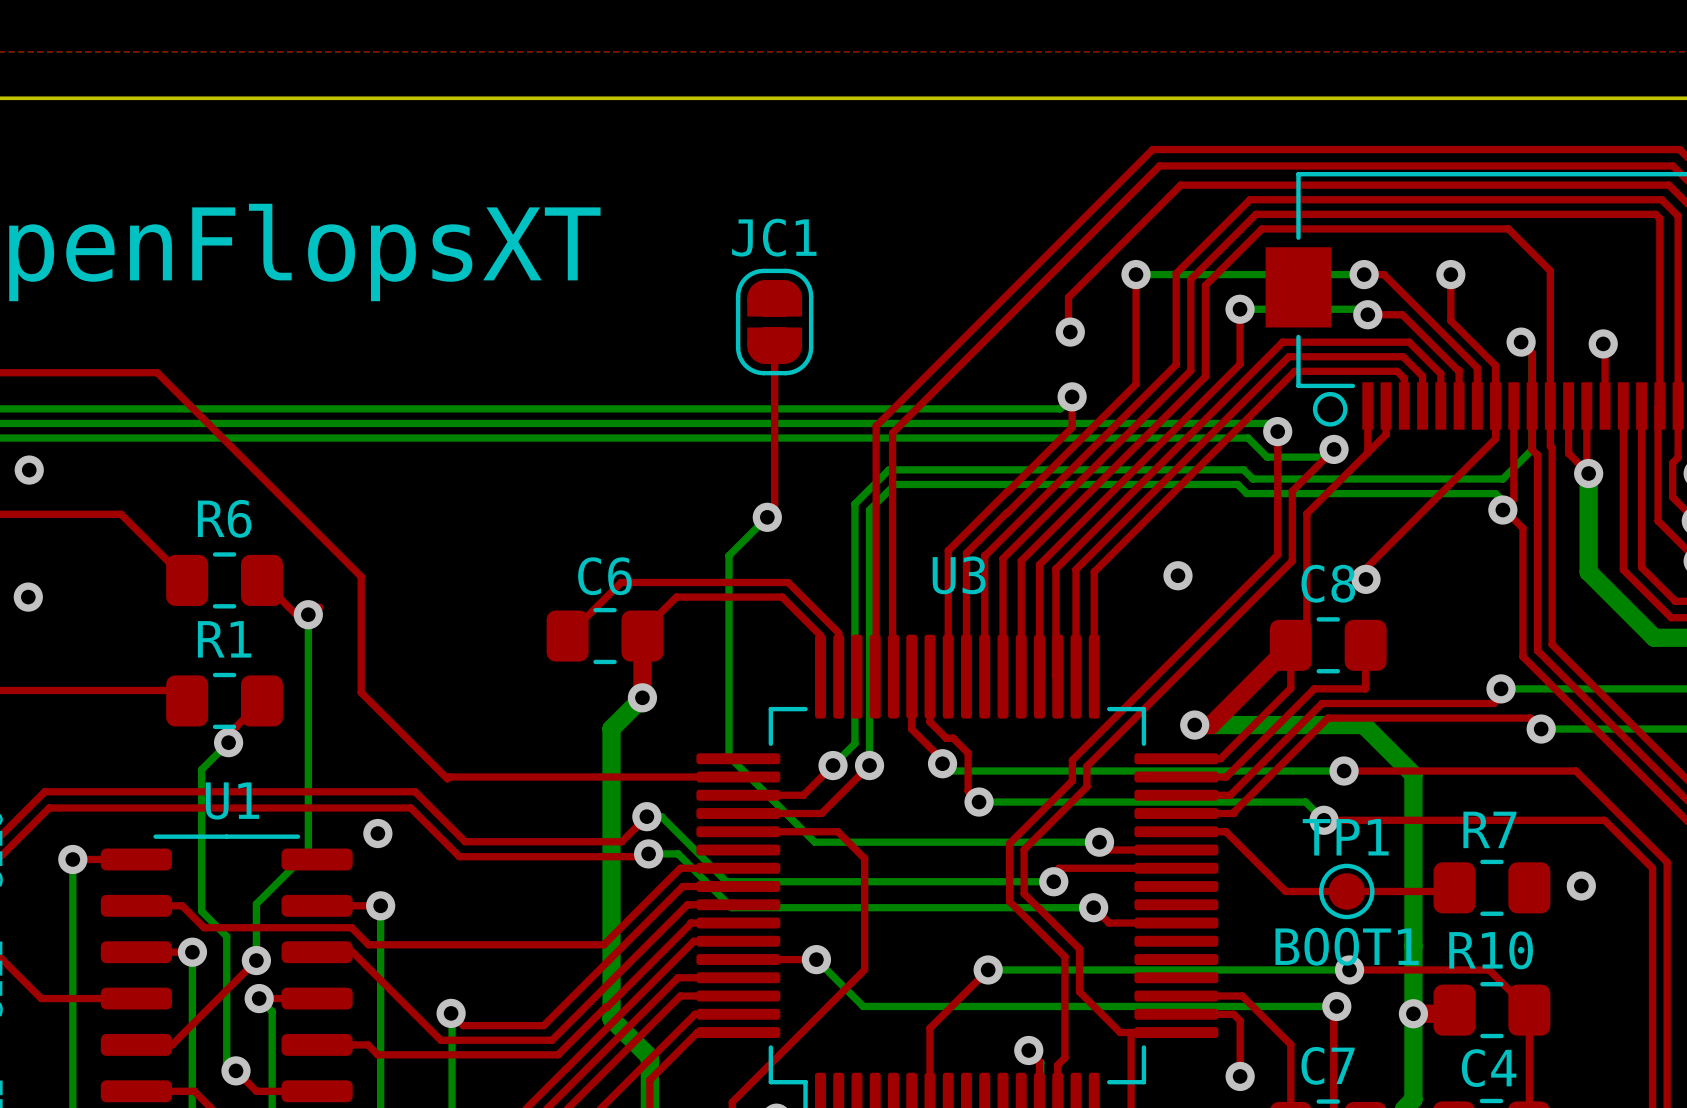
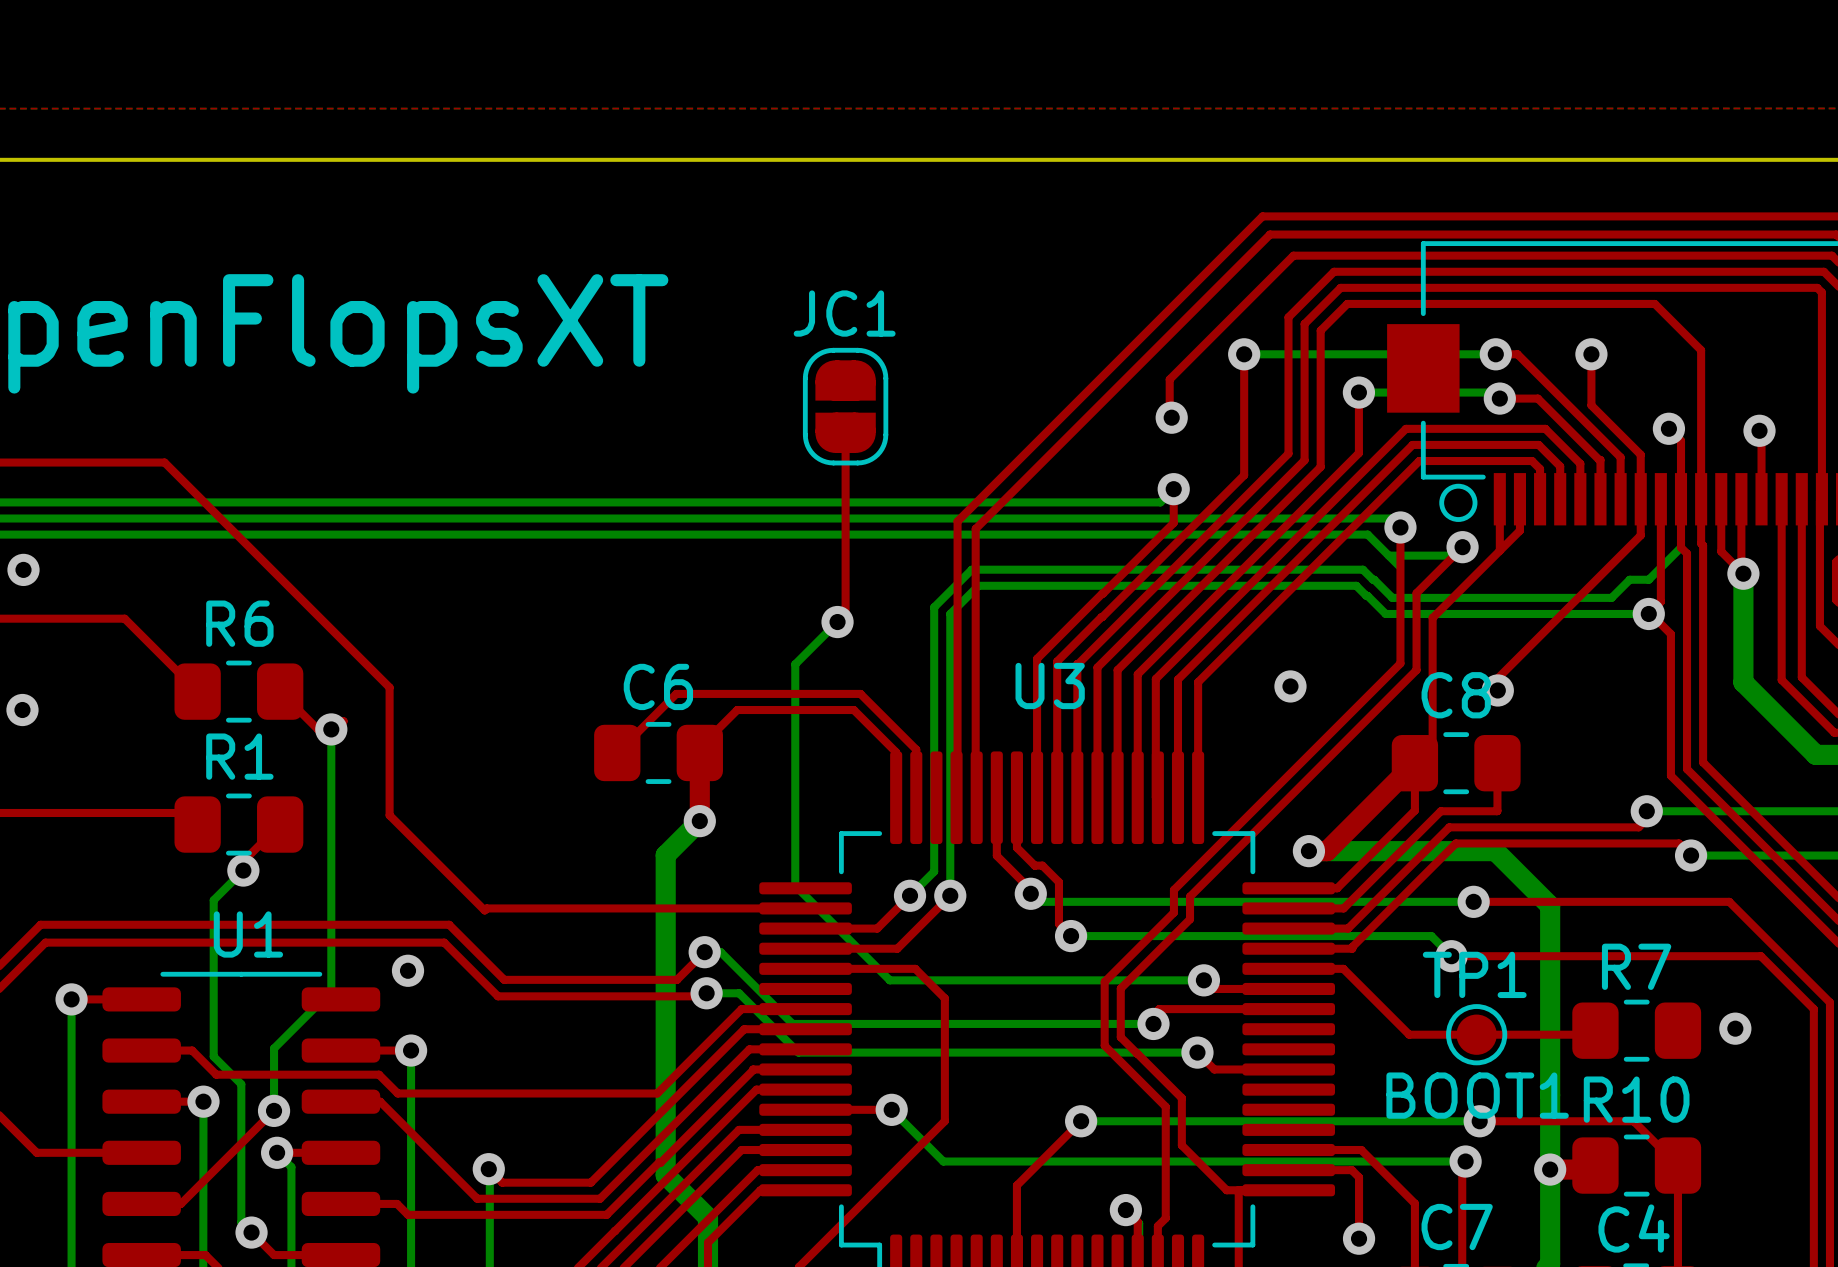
top track: (1249, 199) (1176, 273) -> (1369, 271) (1334, 271) (1288, 317) (1288, 353)
top track: (1255, 214) (1190, 279) -> (1376, 287) (1340, 287) (1304, 323) (1304, 359)
top track: (1262, 228) (1205, 285) -> (1383, 303) (1347, 303) (1320, 330) (1320, 366)
bottom track: (1248, 438) (1267, 457) -> (1367, 534) (1398, 565)
bottom track: (1253, 478) (1485, 478) -> (1374, 579) (1392, 597) (1611, 597) (1629, 579)
bottom track: (1246, 493) (1495, 493) (1502, 500) (1502, 510) -> (1366, 595) (1385, 613) (1648, 613)

